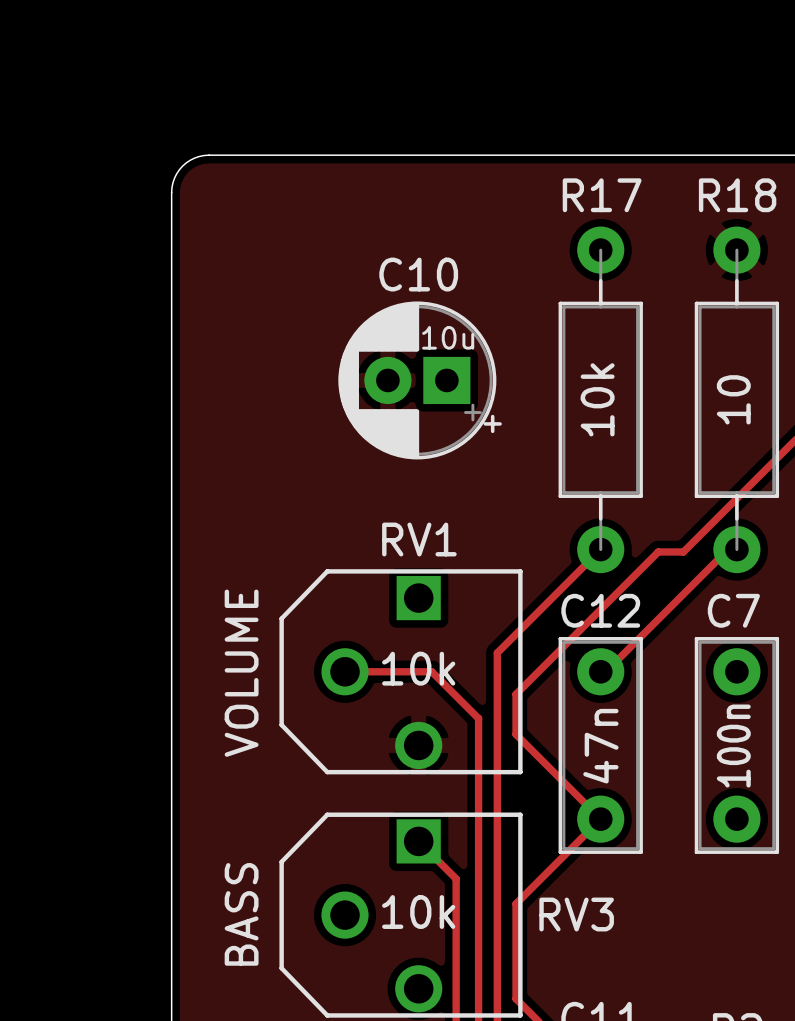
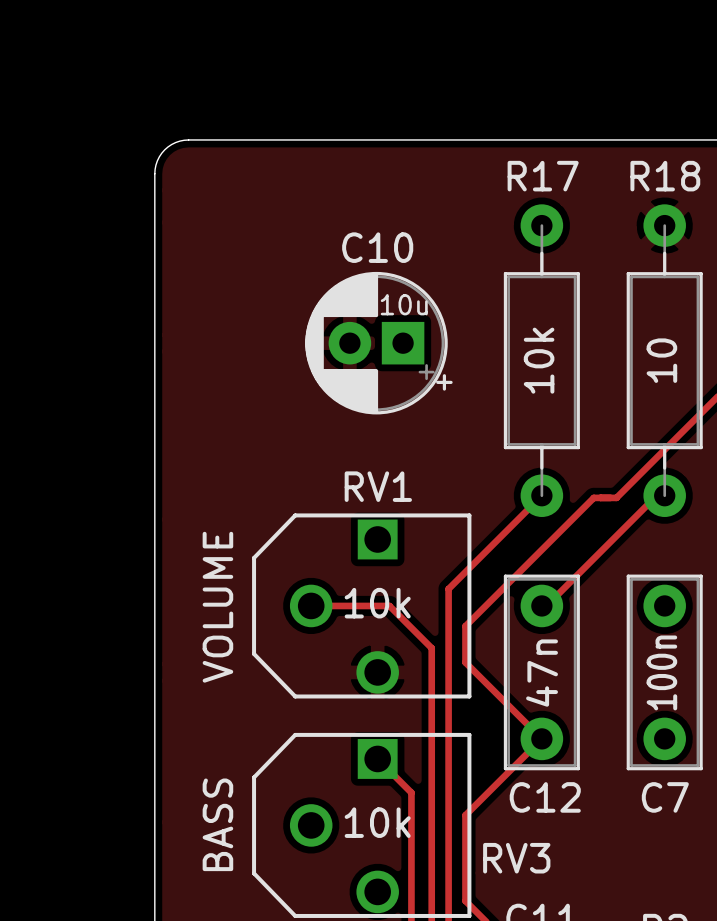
C12 name position: C12 (600, 610) -> C12 (545, 797)
C7 name position: C7 (733, 610) -> C7 (665, 797)
RV3 name position: RV3 (576, 914) -> RV3 (516, 858)

